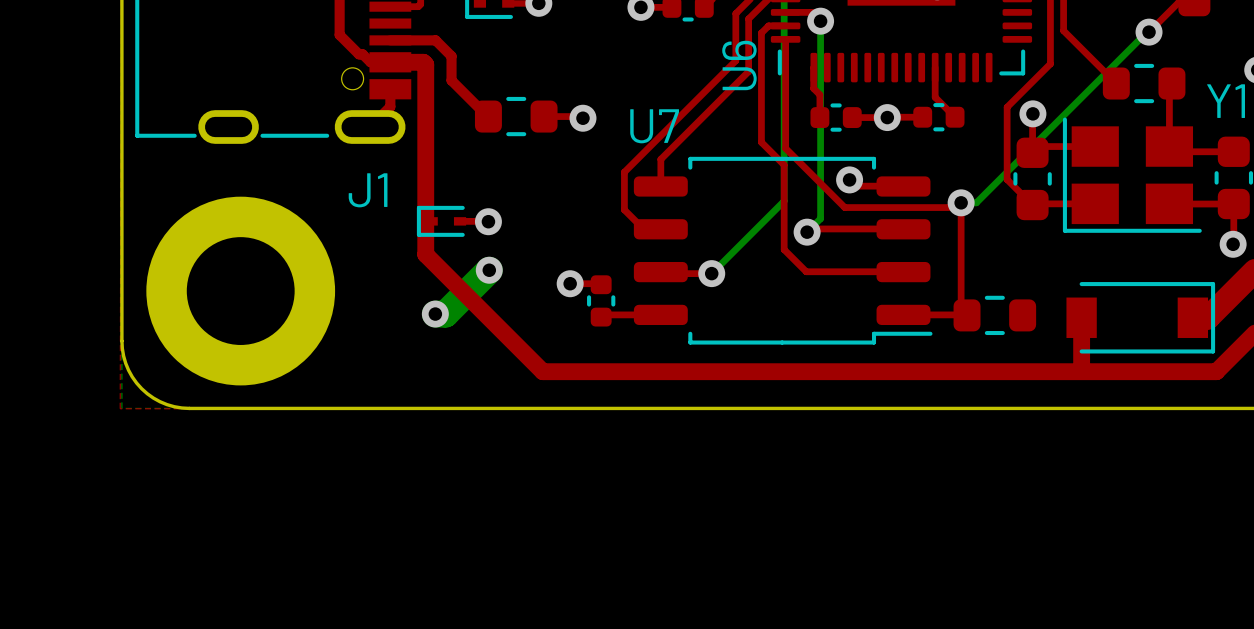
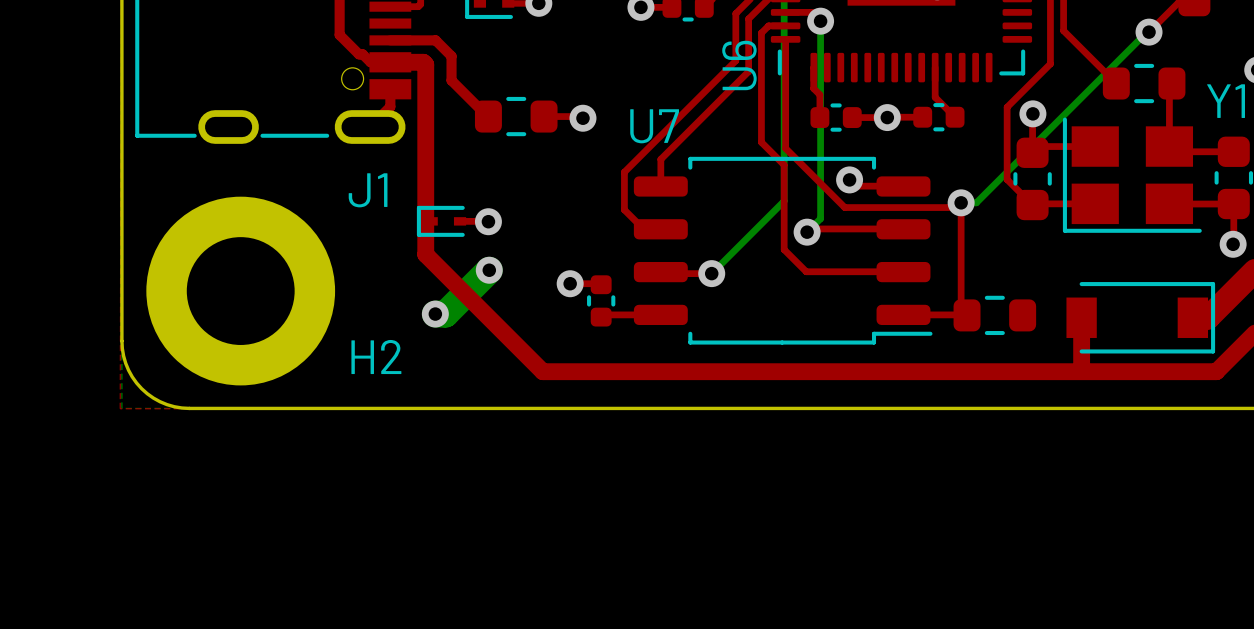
H2 name: none -> H2 (376, 357)

